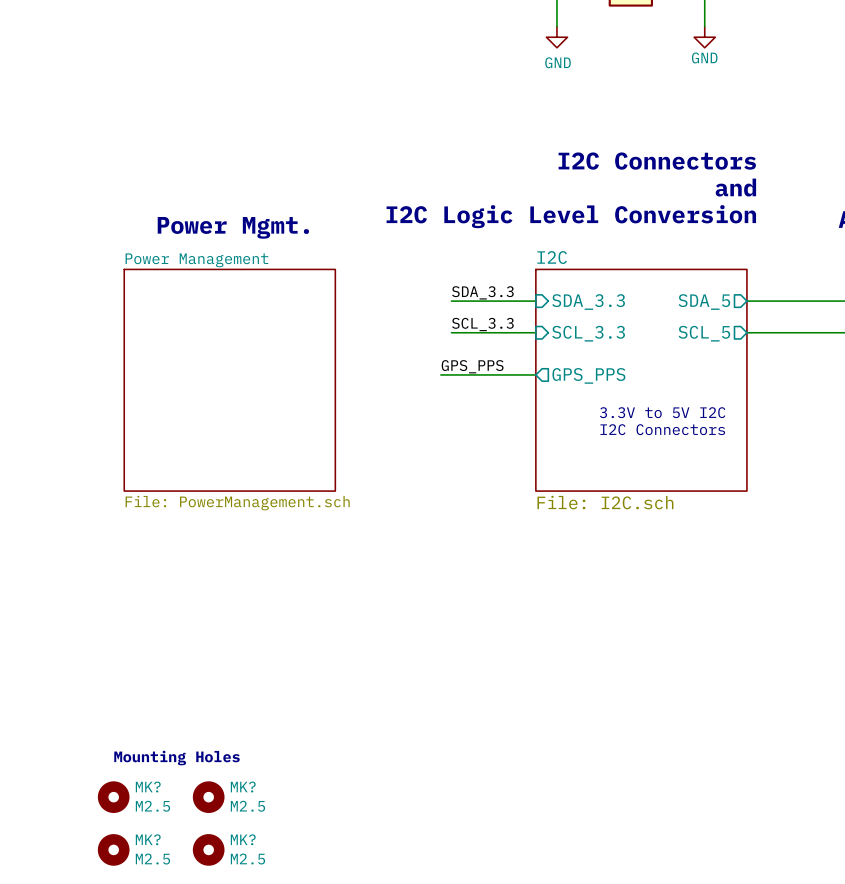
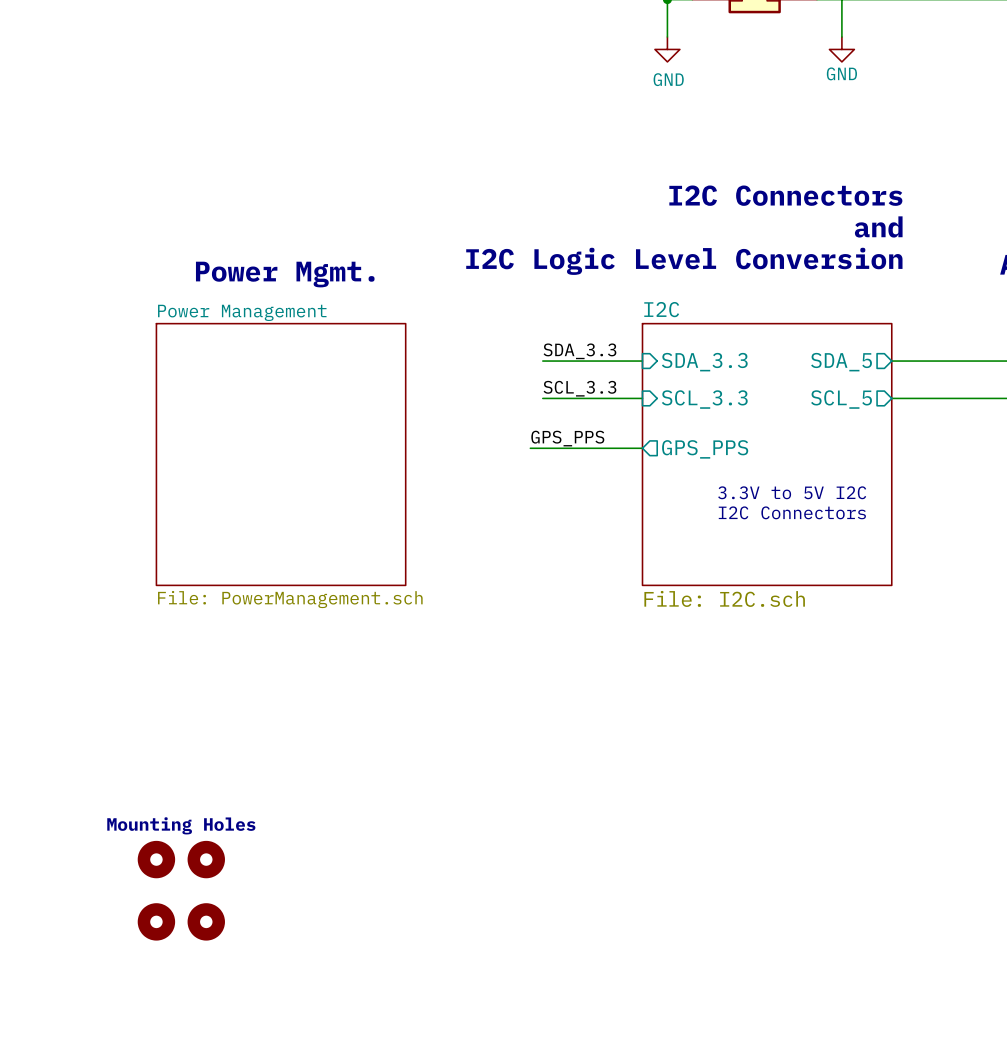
part: none -> (156, 859)
part: none -> (206, 859)
text position: Mounting Holes (176, 758) -> Mounting Holes (181, 825)
part: none -> (156, 921)
part: none -> (206, 921)
MK?: M2.5 (113, 797) -> none
MK?: M2.5 (208, 797) -> none
MK?: M2.5 (113, 849) -> none
MK?: M2.5 (208, 849) -> none

